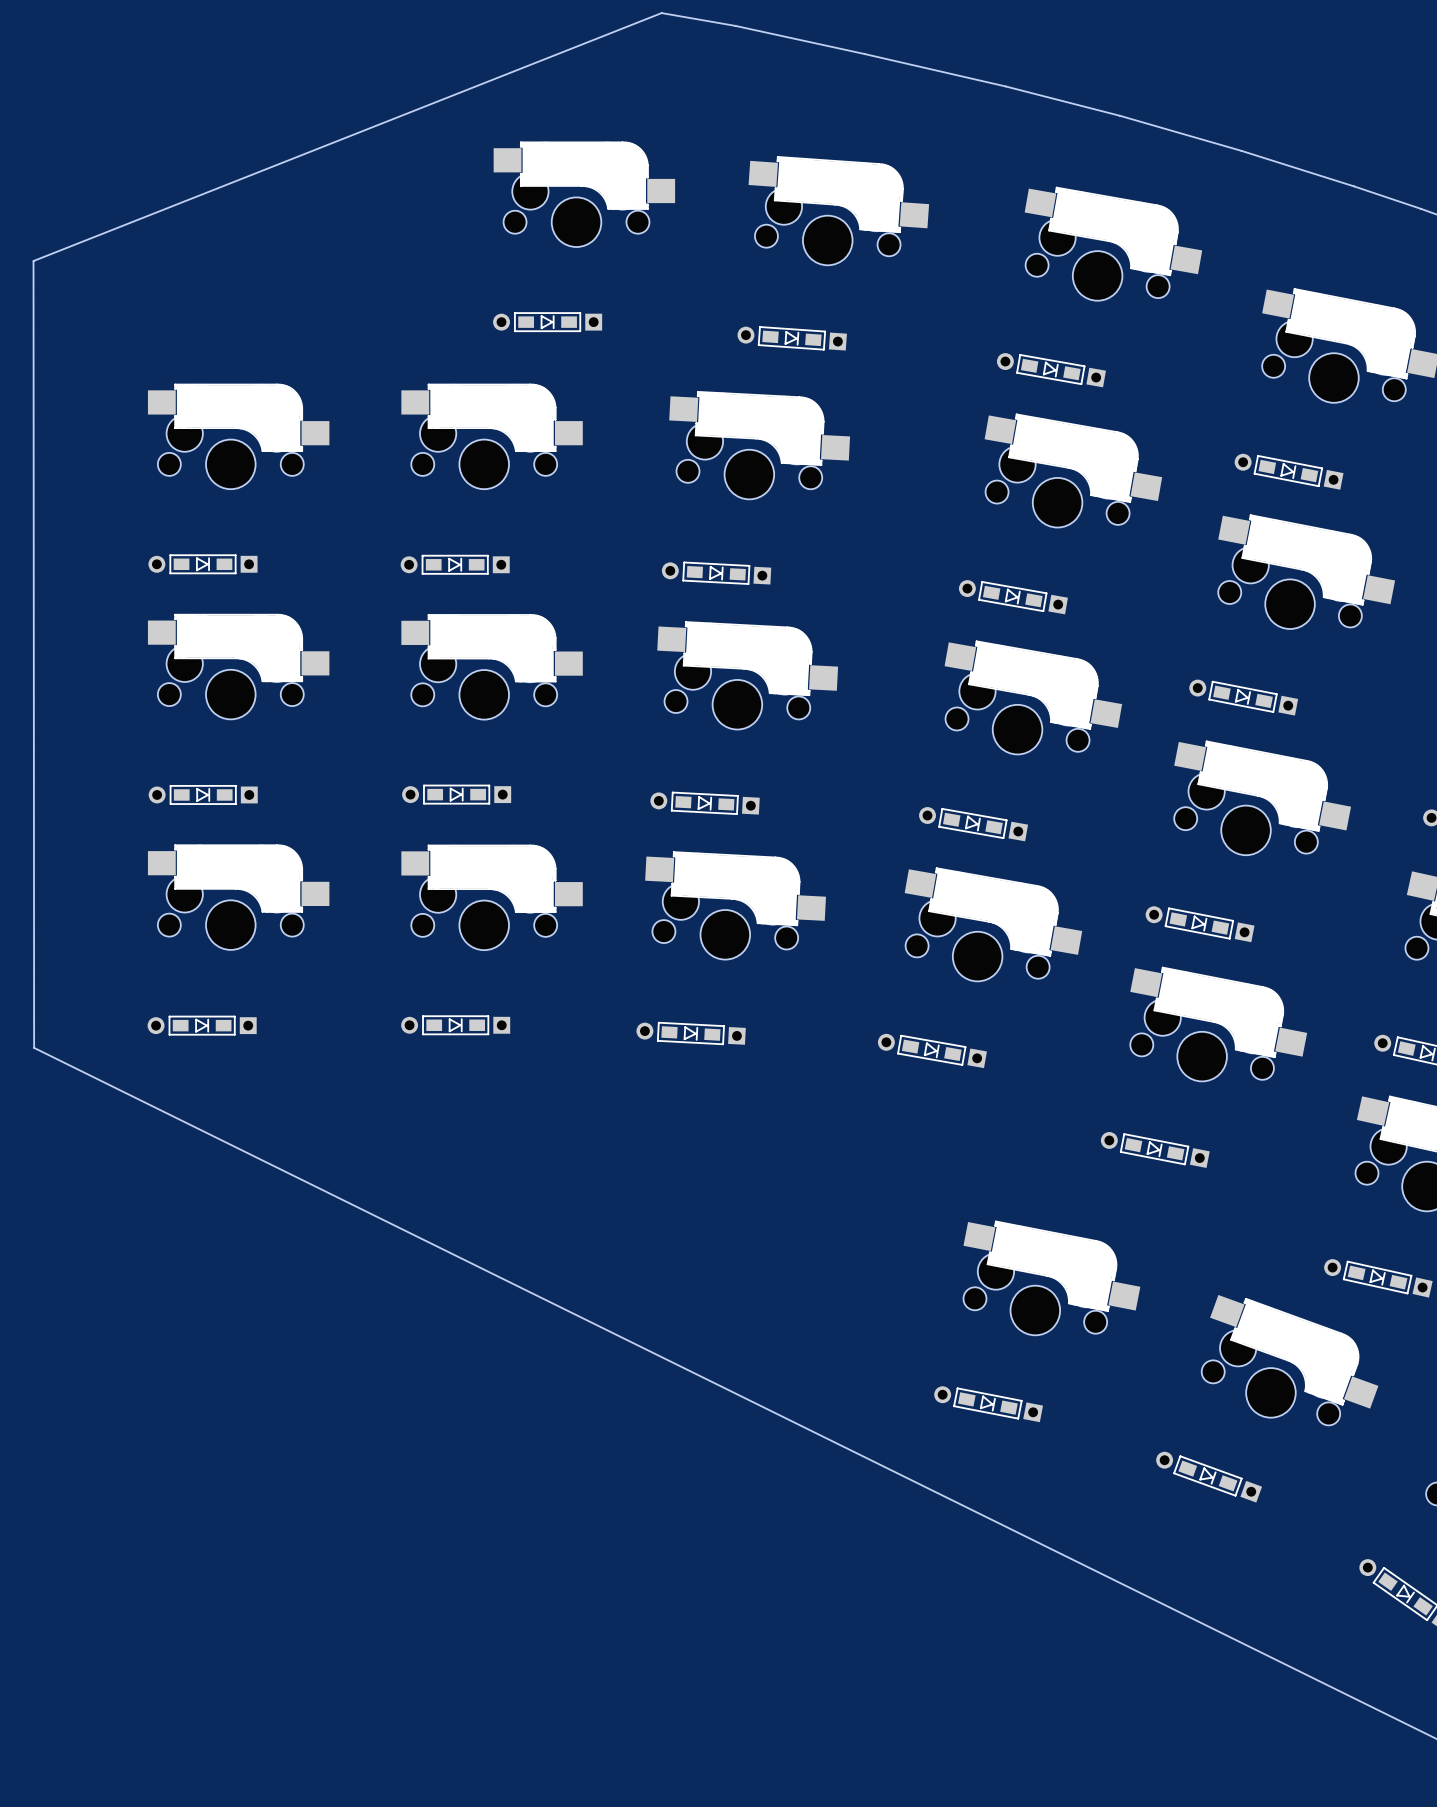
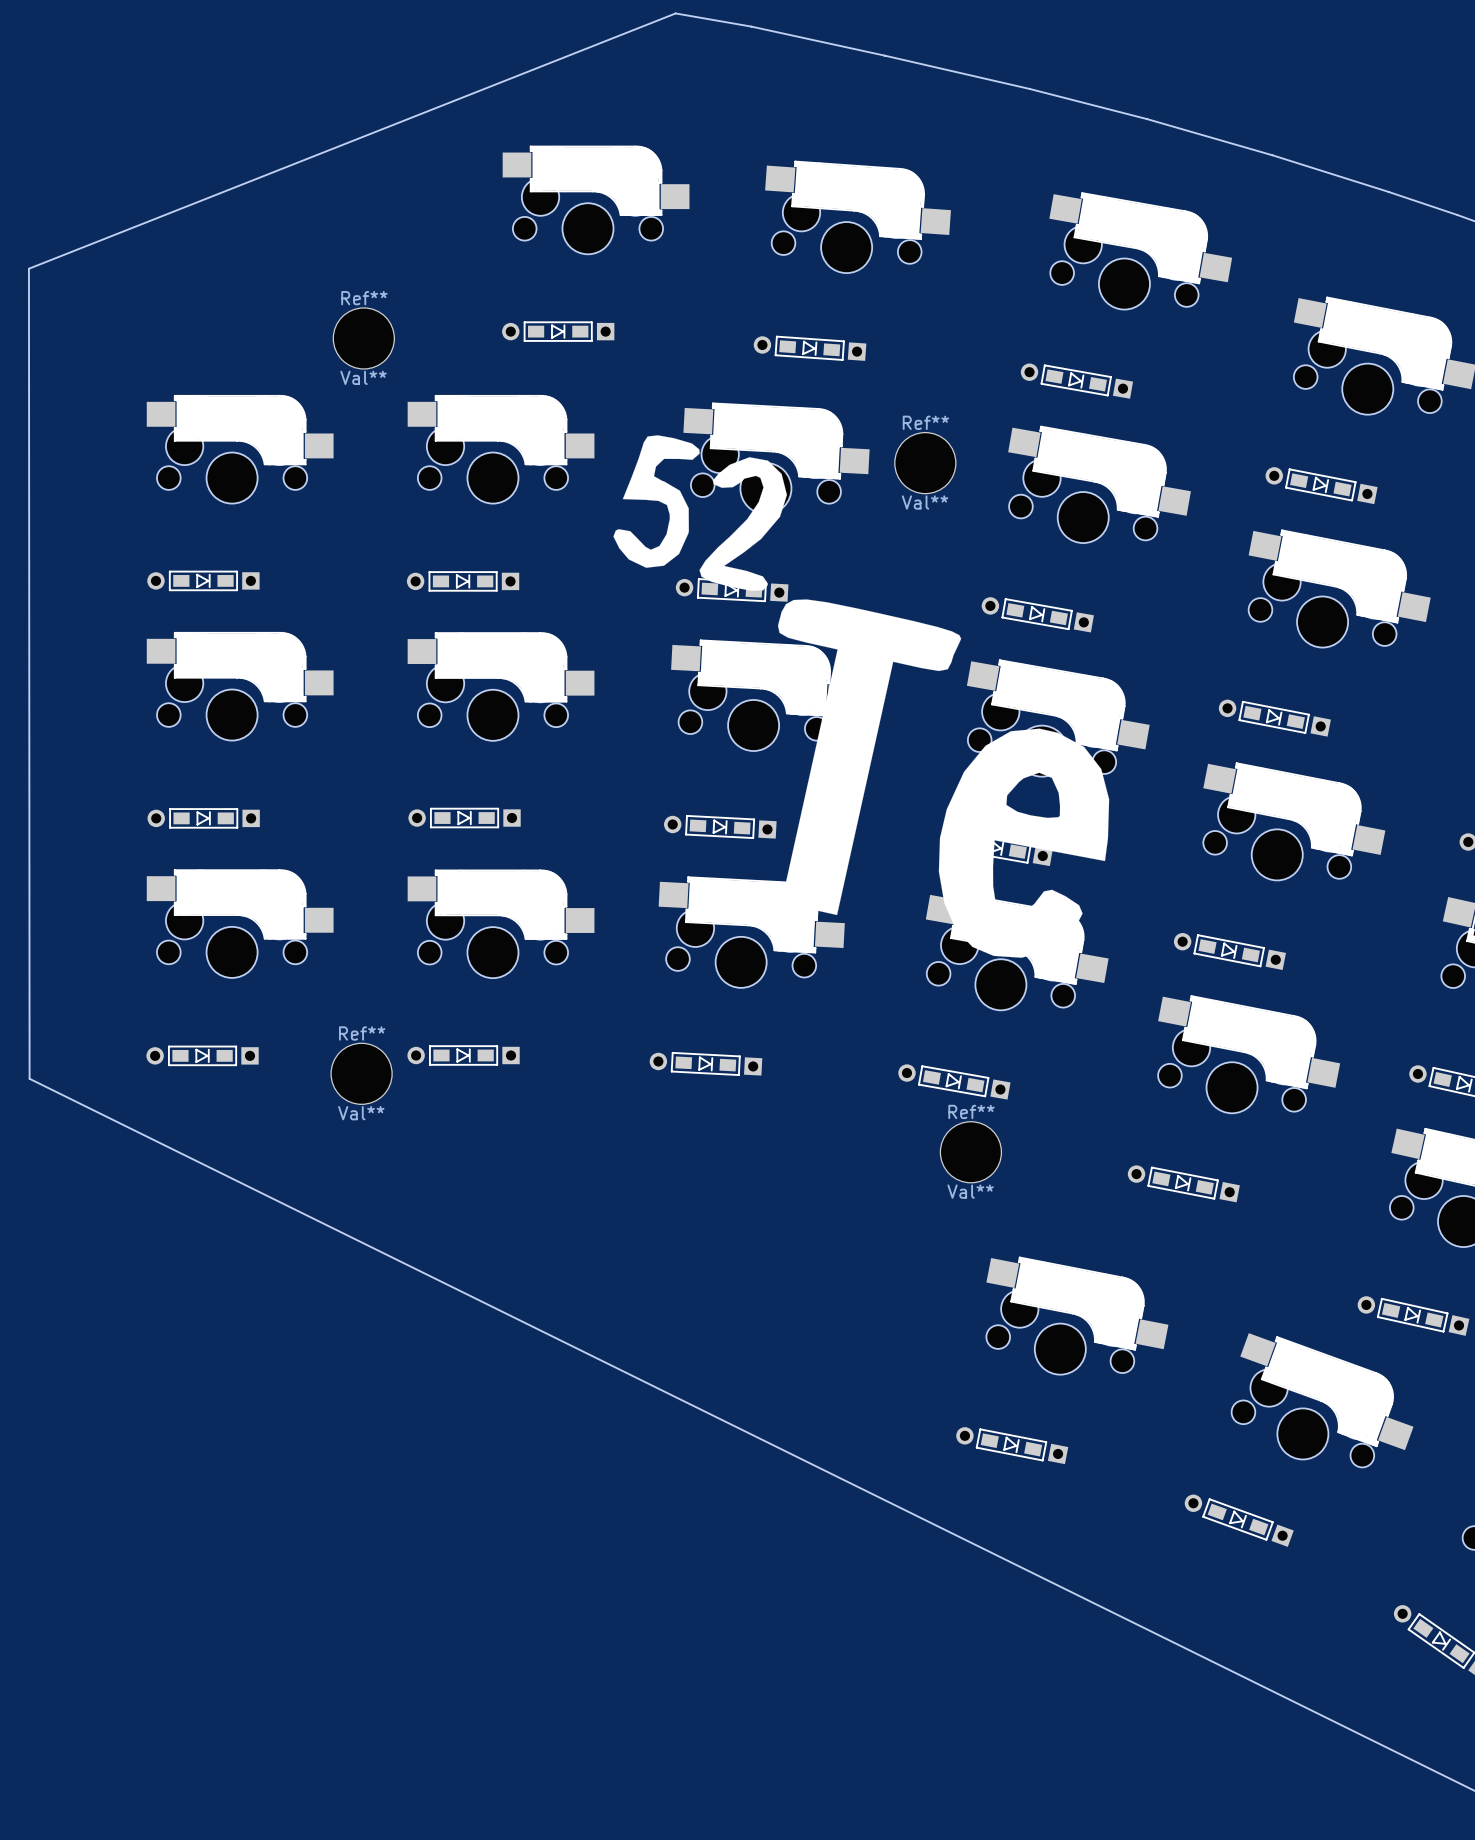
Ref**: none -> Val** (363, 338)
drawing: none -> [613, 435, 1110, 958]
Ref**: none -> Val** (925, 463)
Ref**: none -> Val** (361, 1073)
Ref**: none -> Val** (970, 1152)

